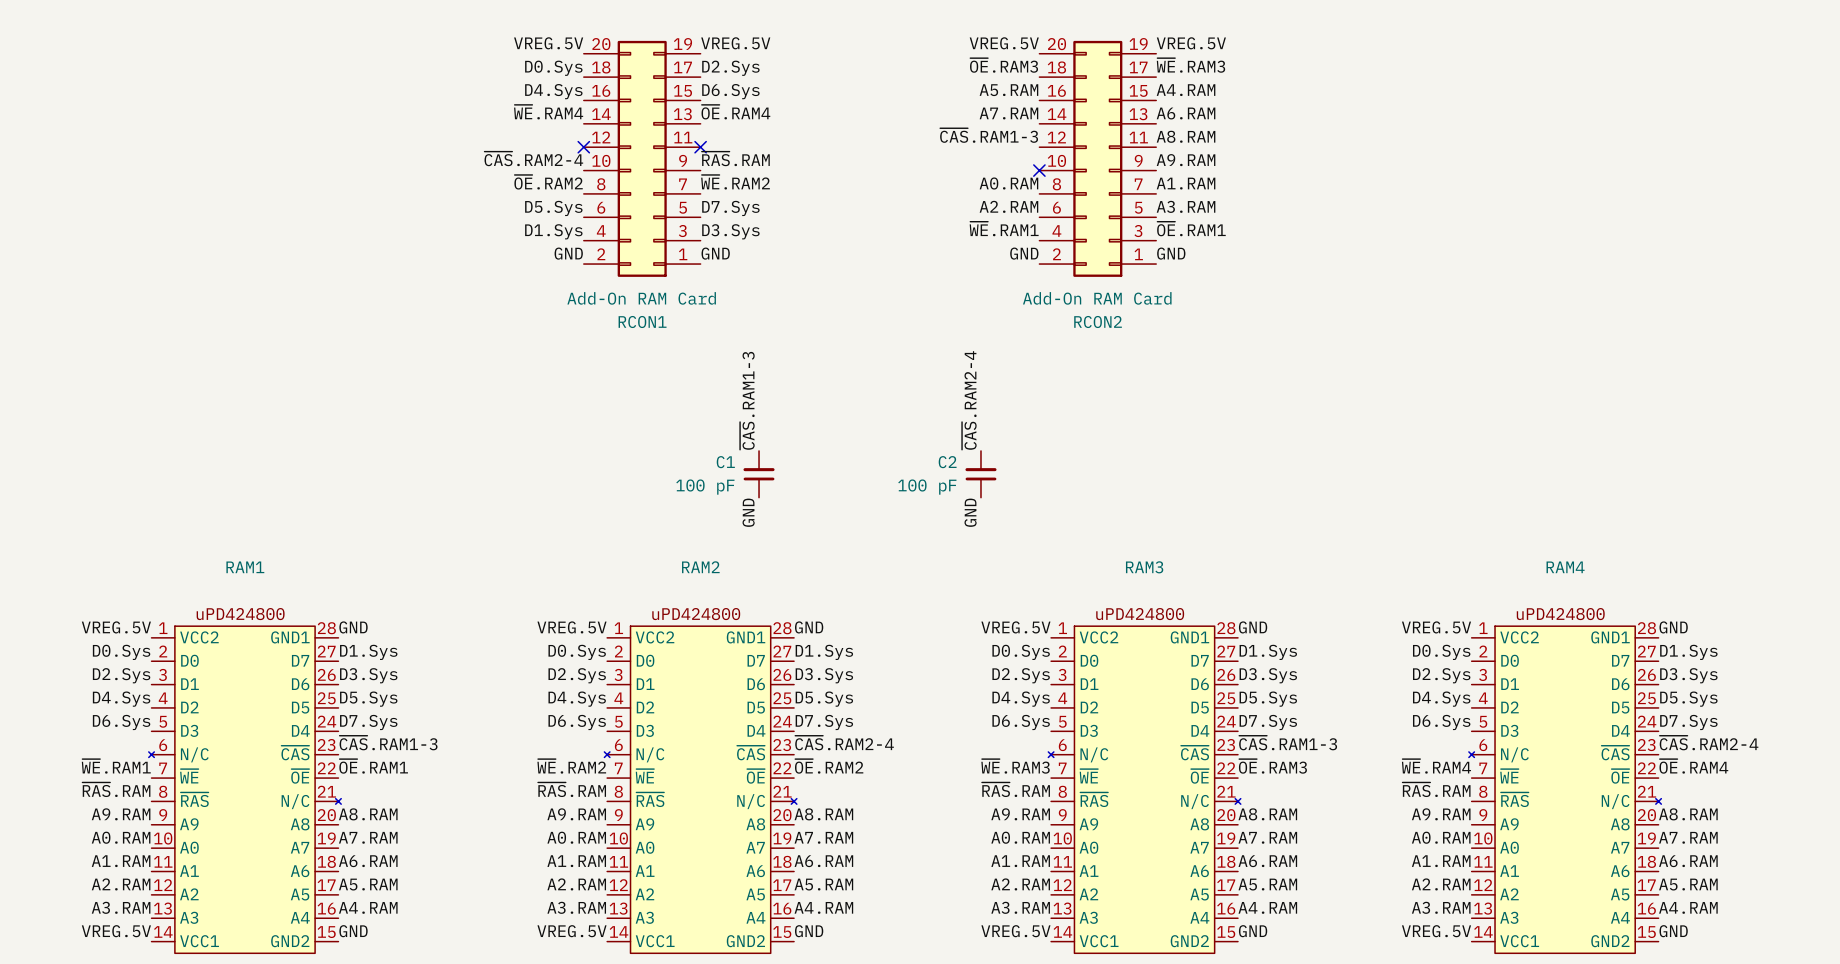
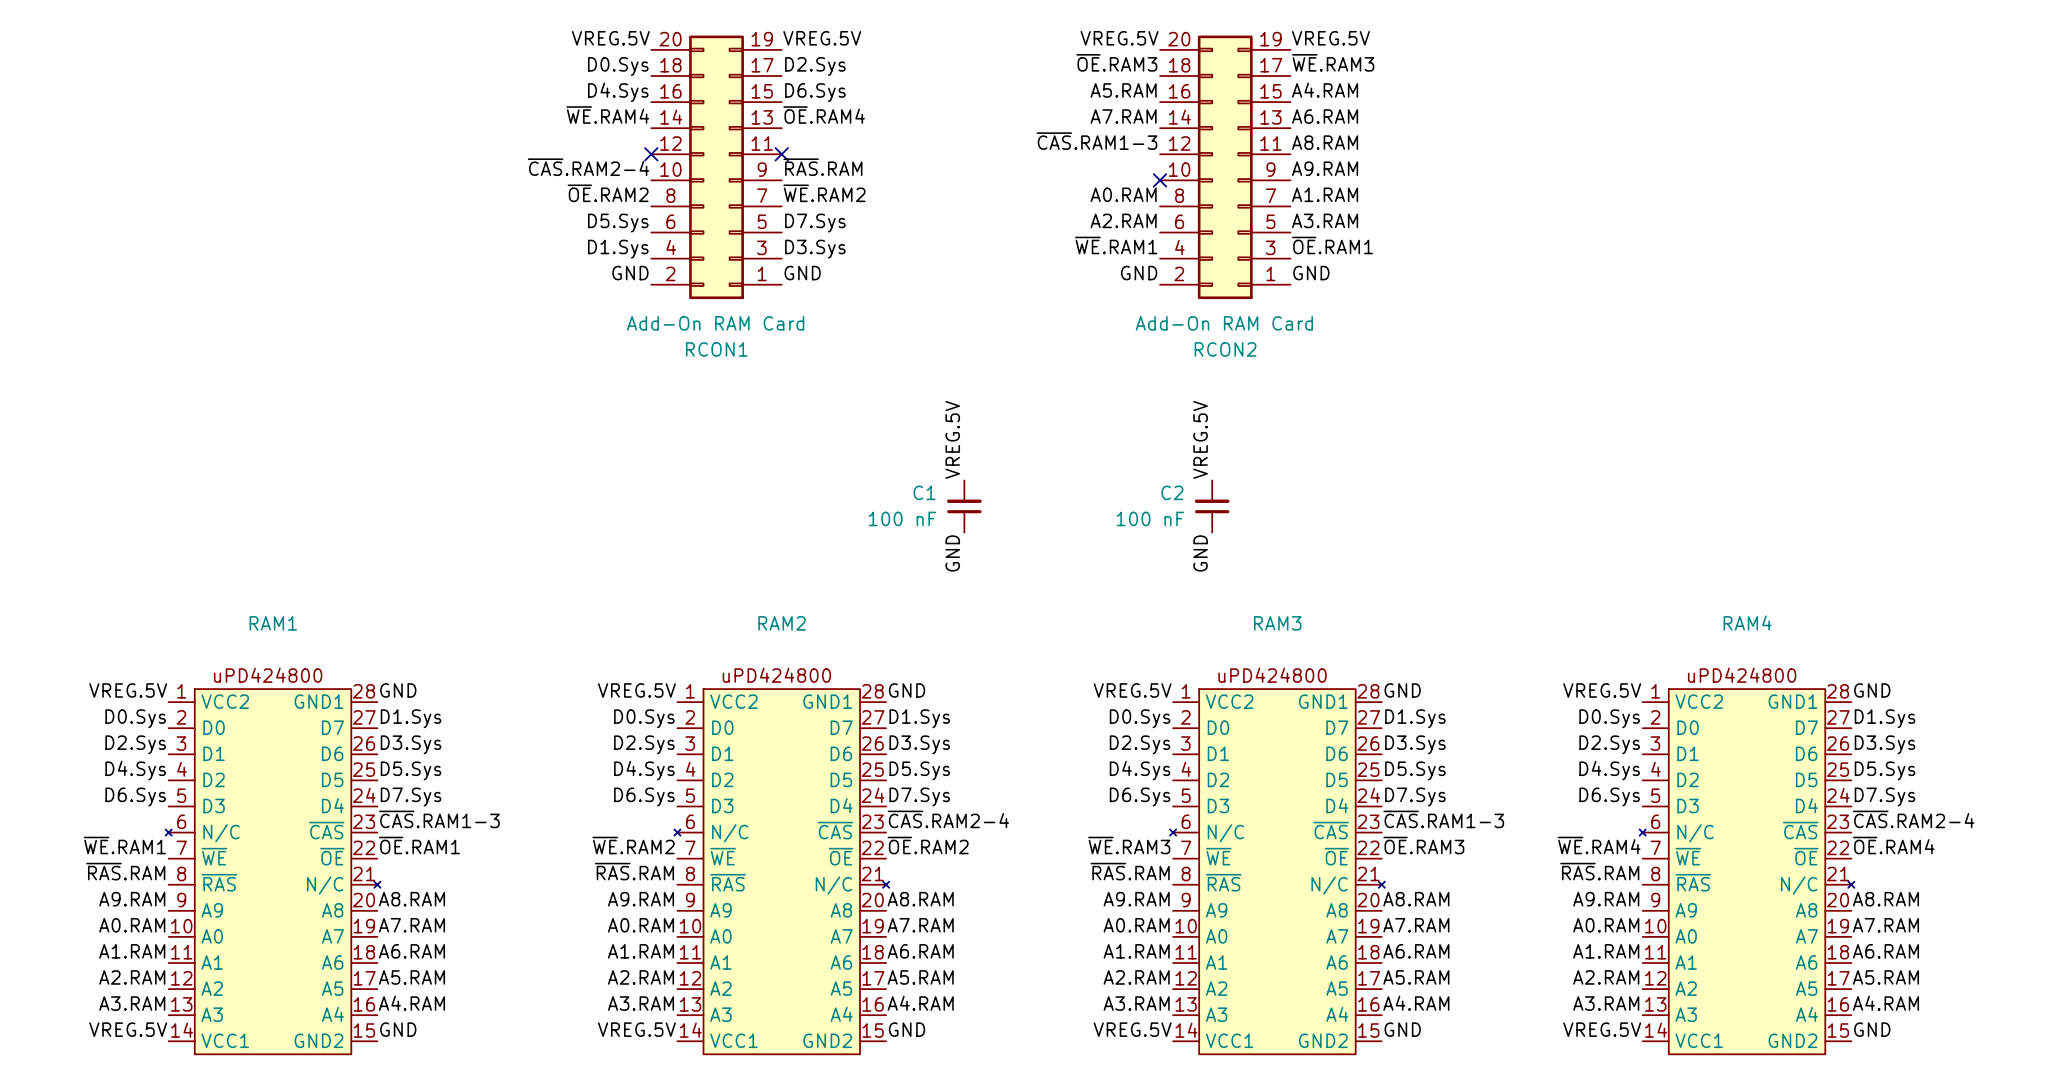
label: ~{CAS}.RAM1-3 (747, 400) -> none
label: ~{CAS}.RAM2-4 (969, 400) -> none
label: none -> VREG.5V (952, 439)
label: none -> VREG.5V (1200, 439)
C1 position: (759, 474) -> (964, 506)
C2 position: (980, 474) -> (1212, 506)
C1 value: 100 pF (705, 487) -> 100 nF (902, 518)
C2 value: 100 pF (927, 487) -> 100 nF (1150, 518)
label: none -> GND (952, 553)
label: none -> GND (1200, 553)
label: GND (748, 512) -> none
label: GND (970, 512) -> none

